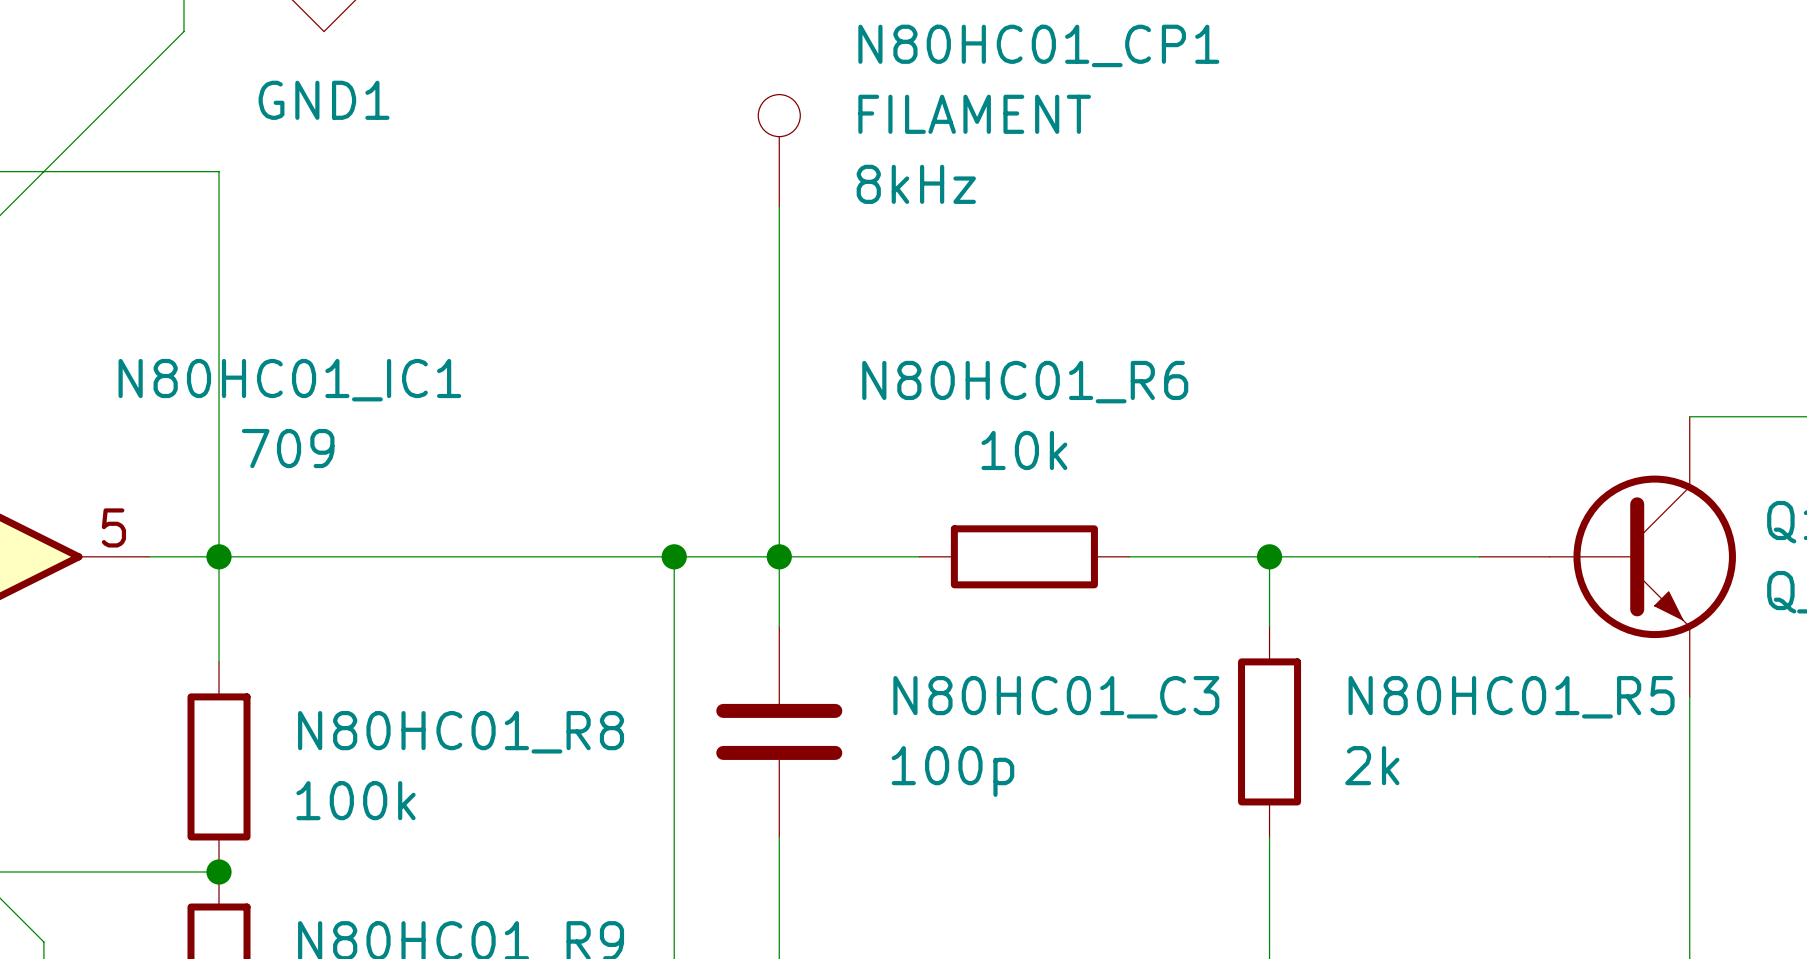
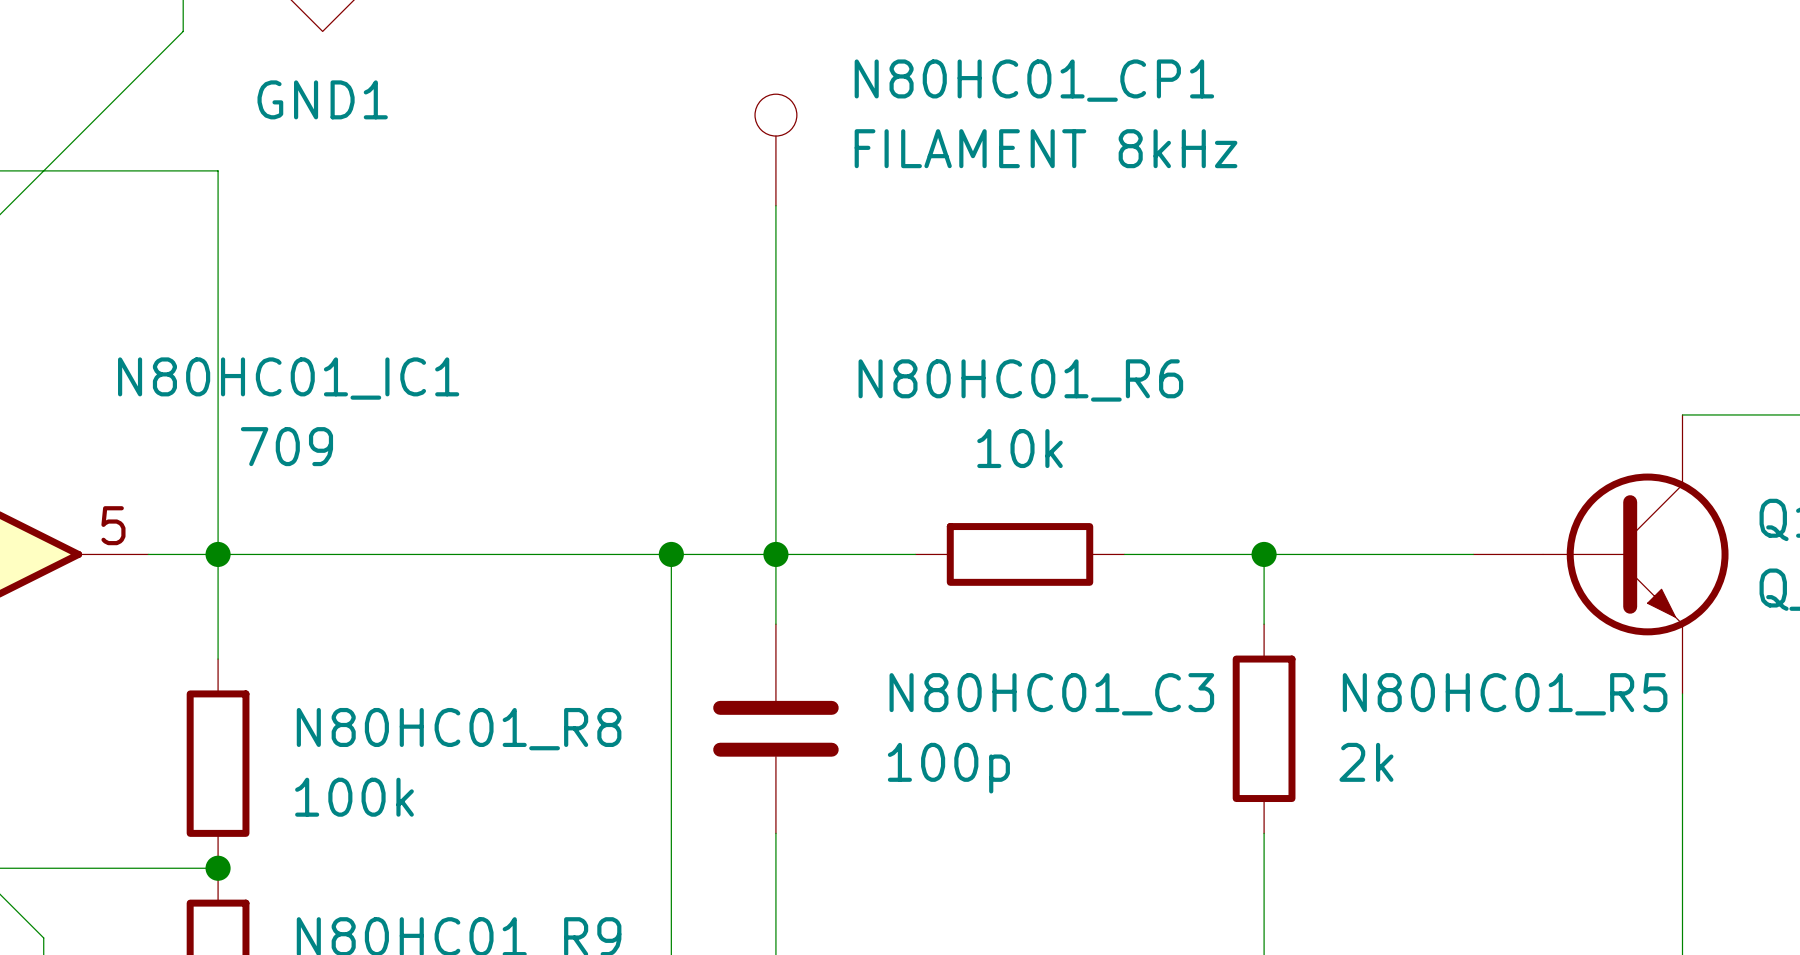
N80HC01_CP1 name position: N80HC01_CP1 (1038, 45) -> N80HC01_CP1 (1034, 80)
N80HC01_CP1 value: FILAMENT (974, 114) -> FILAMENT 8kHz (1046, 148)
N80HC01_CP1 text: 8kHz (916, 184) -> none

